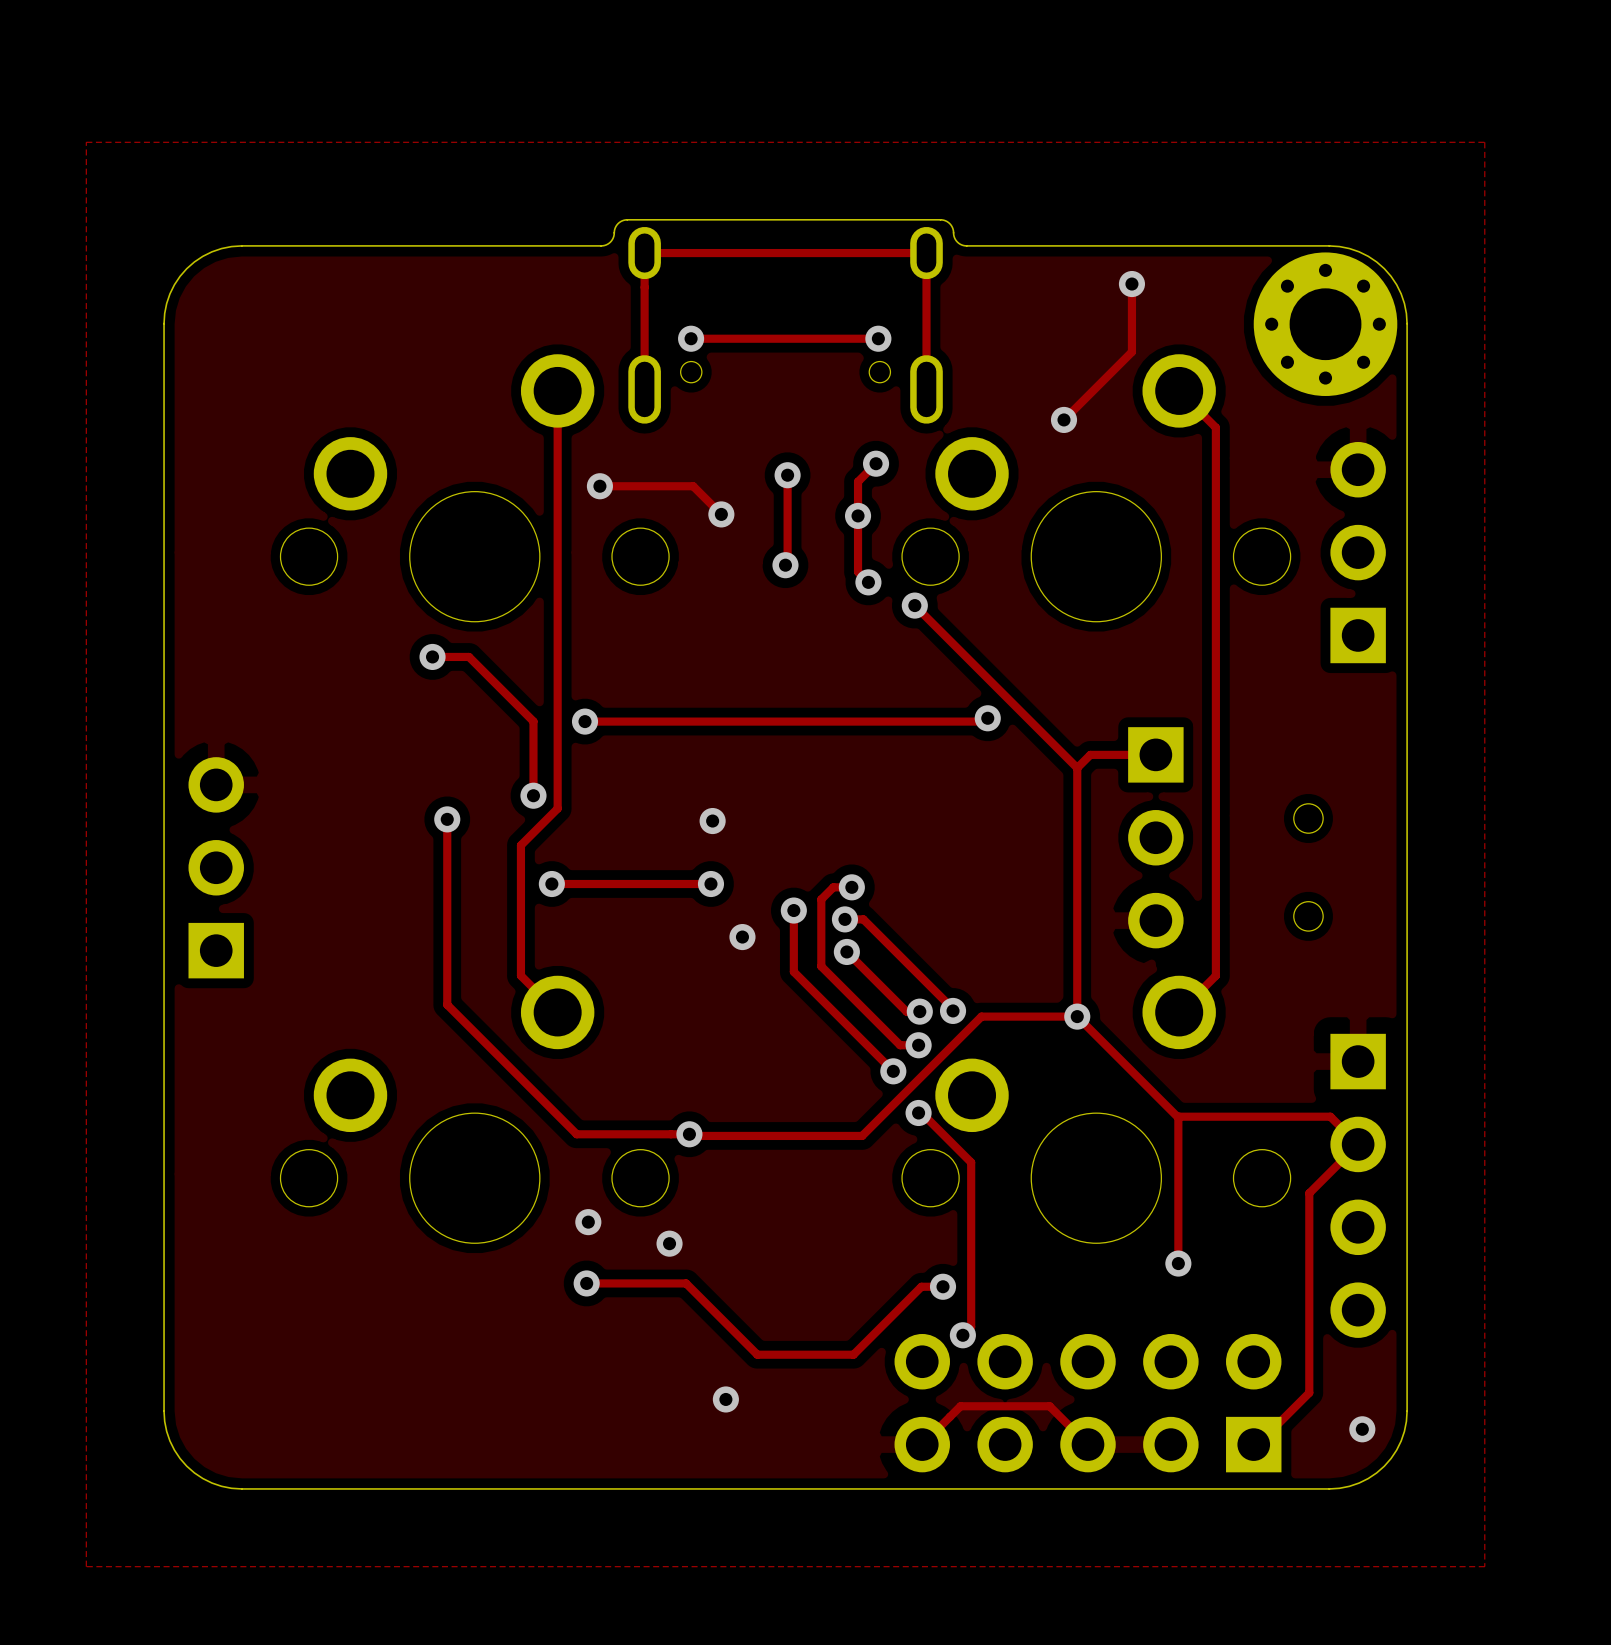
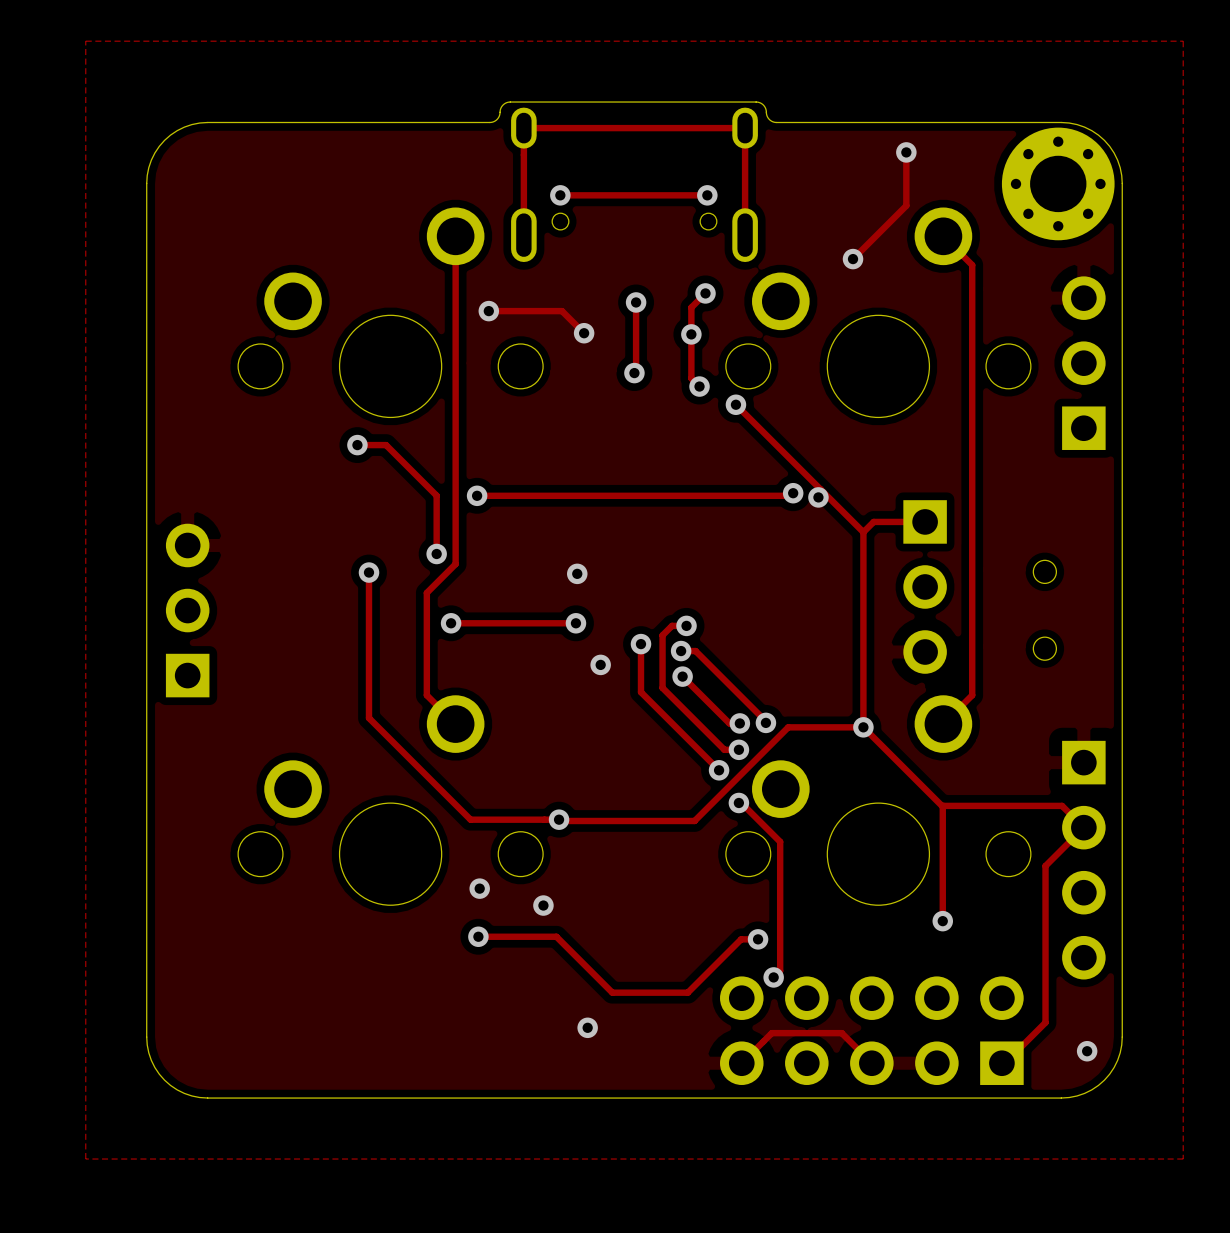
via: none -> (818, 497)

